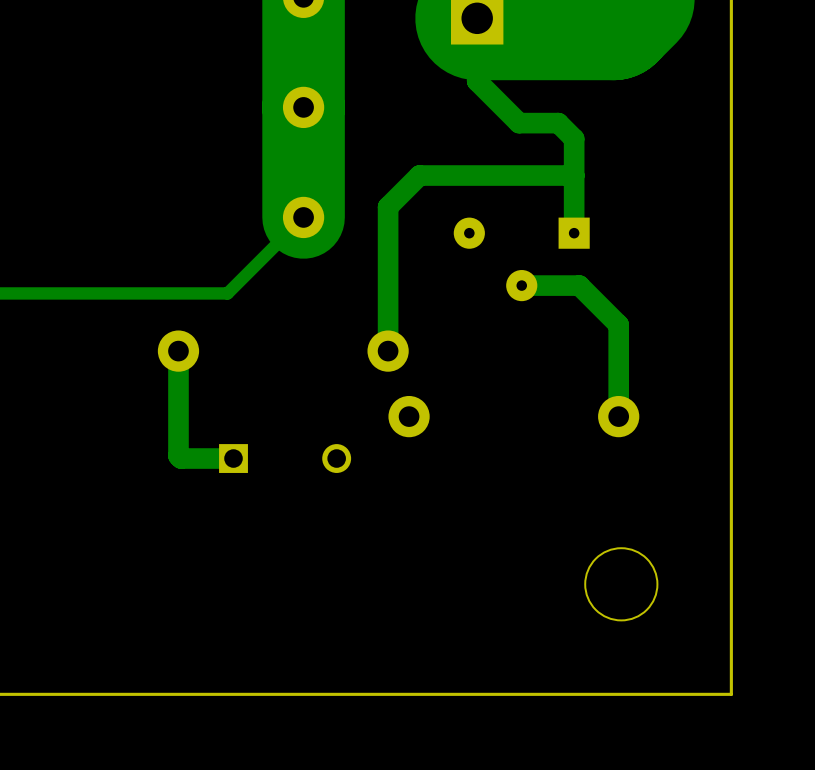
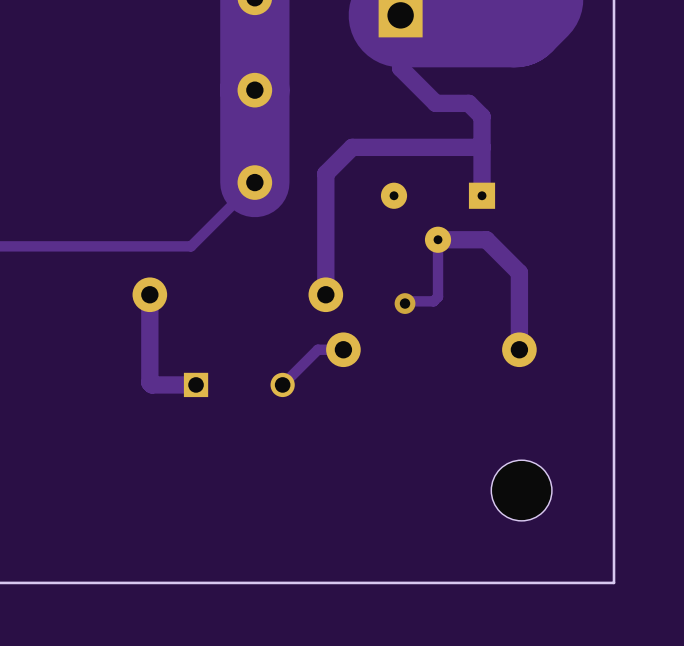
track: none -> (438, 239) (438, 296) (433, 301) (407, 301) (405, 303)
via: none -> (405, 303)
track: none -> (343, 349) (317, 349) (282, 384)

